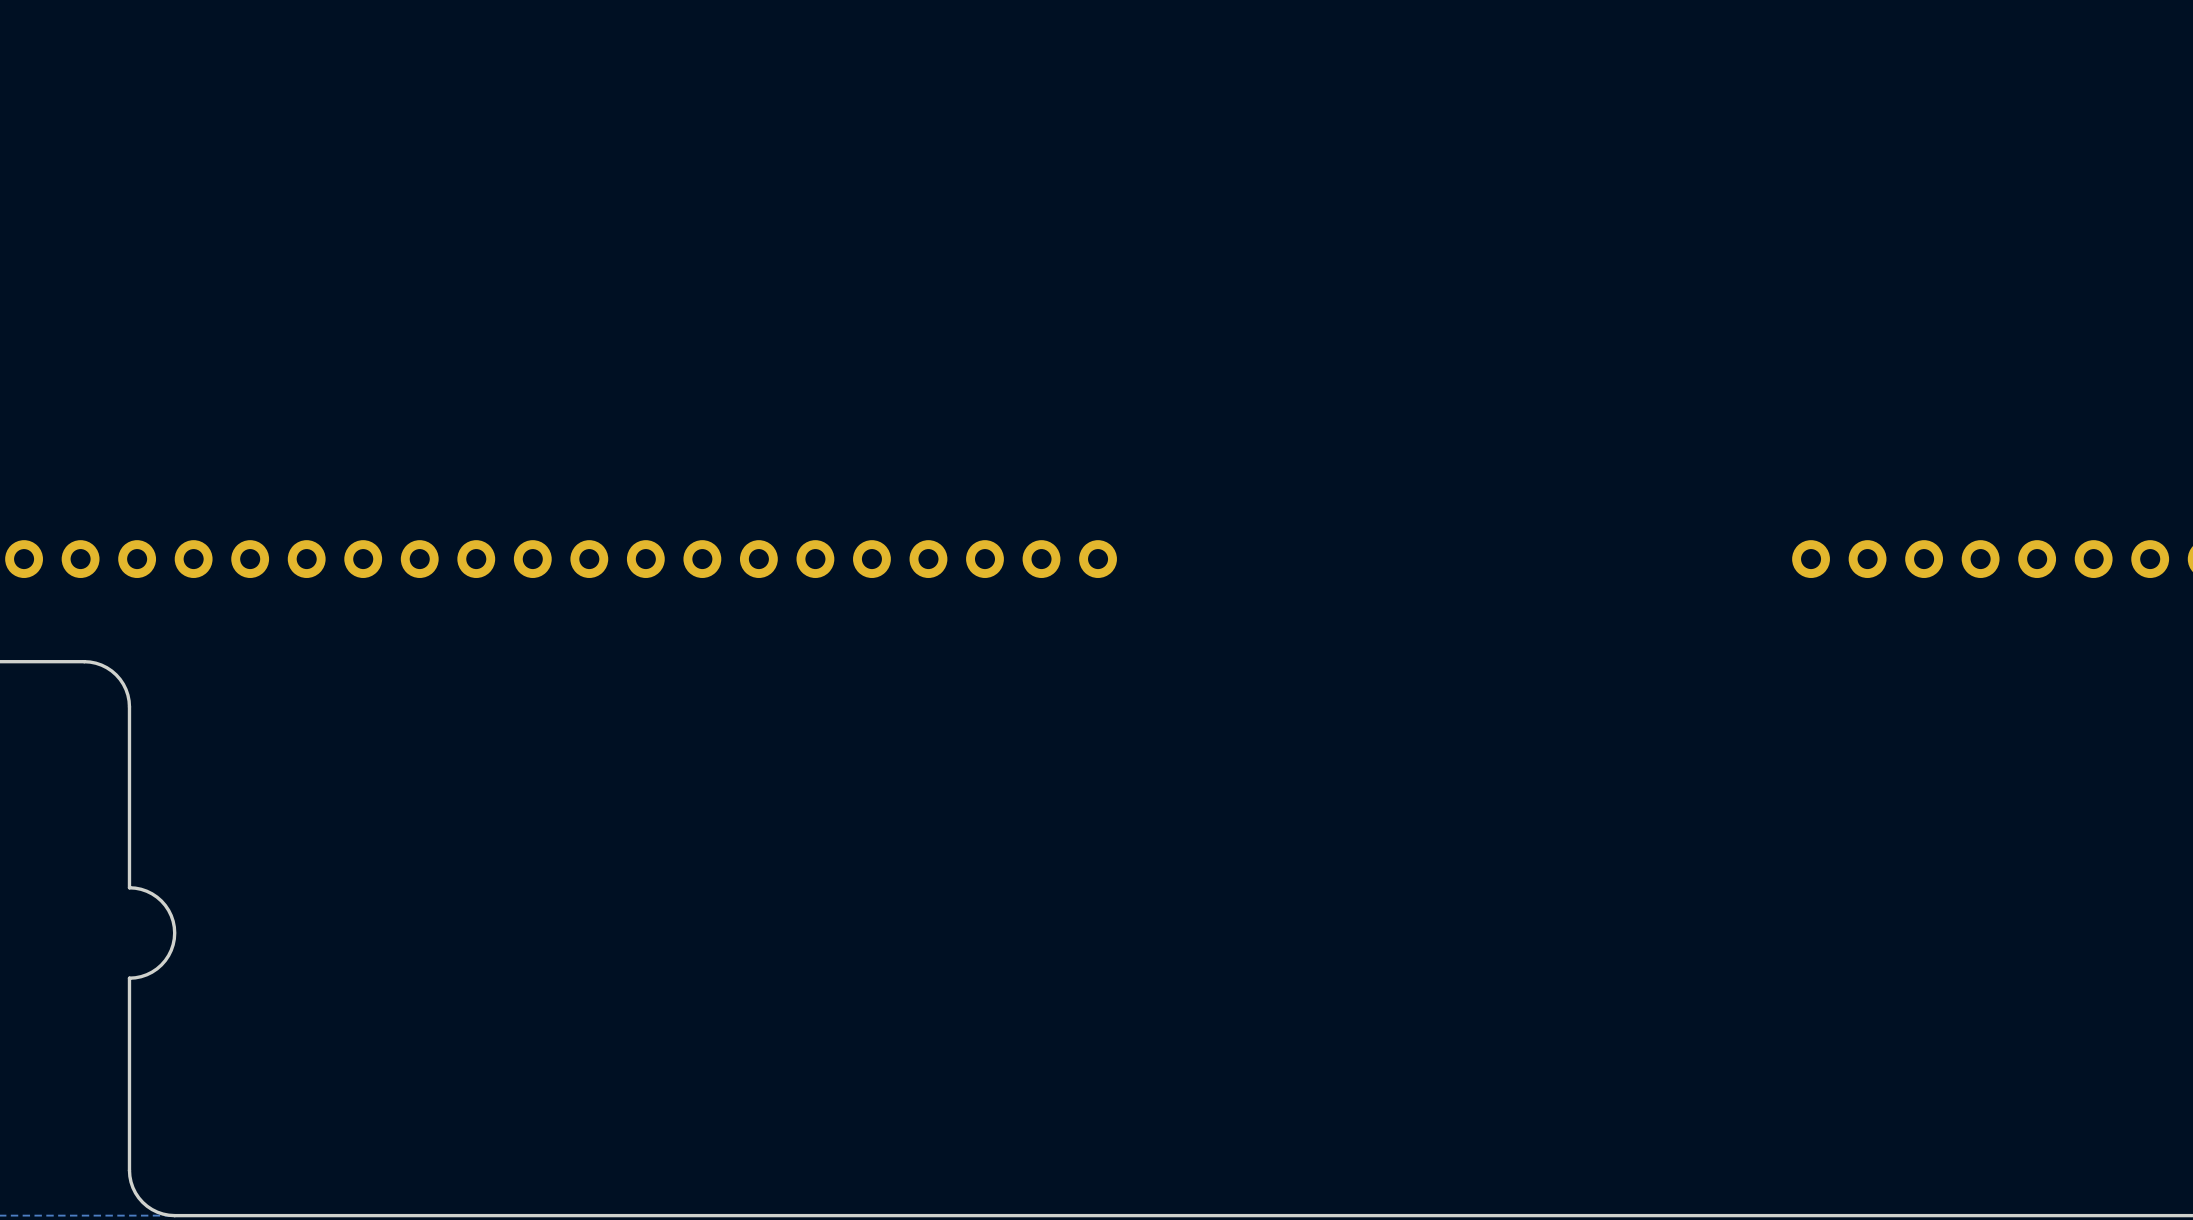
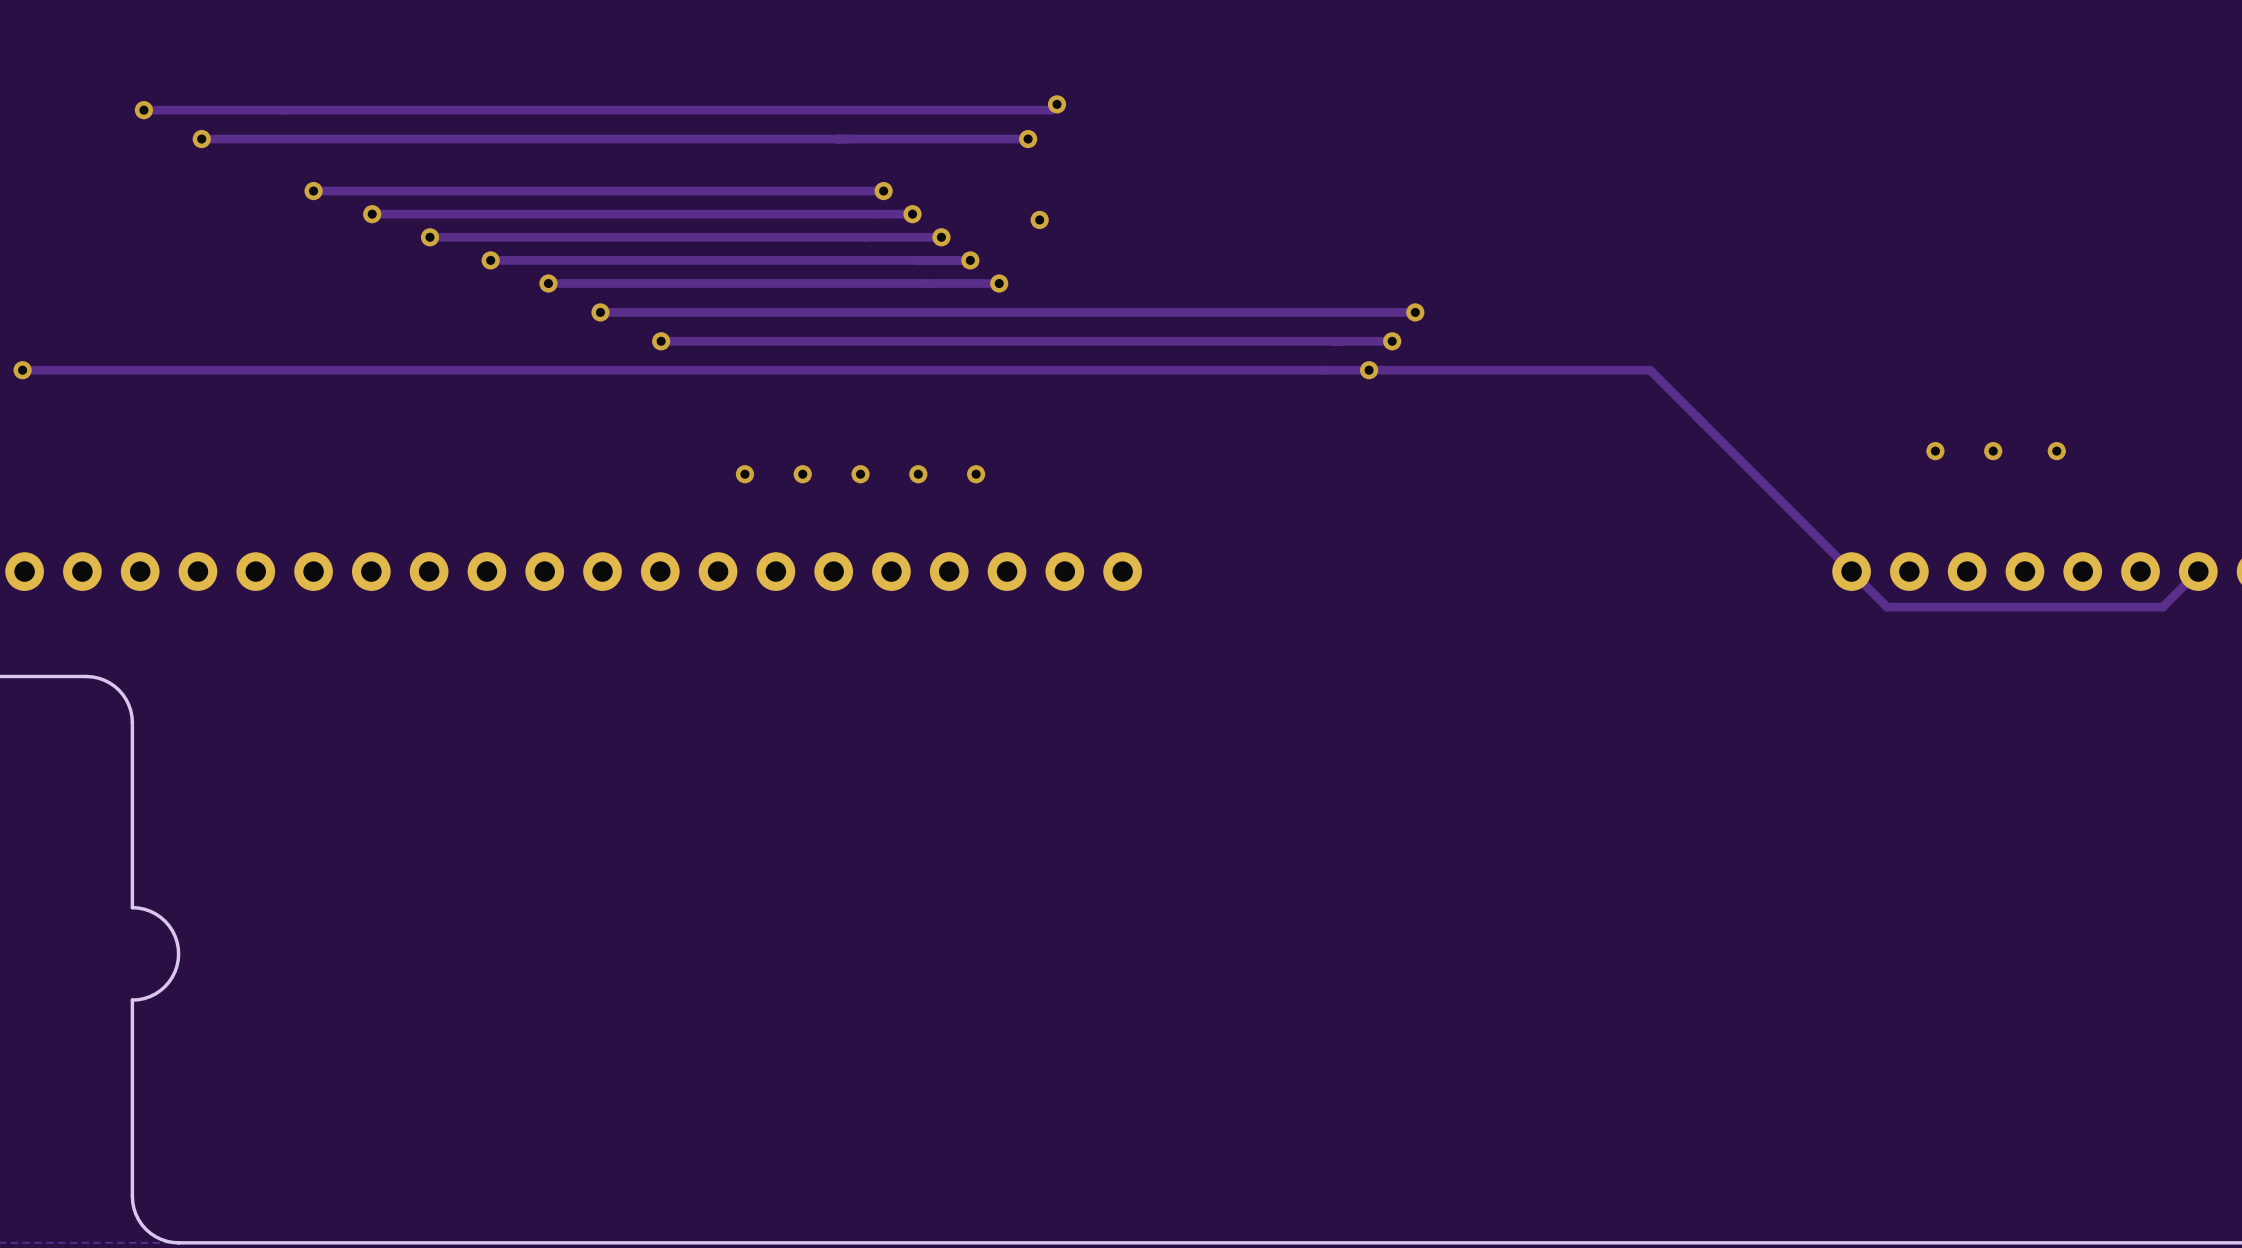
track: none -> (1057, 104) (1051, 110) (143, 110)
via: none -> (1057, 104)
via: none -> (143, 110)
via: none -> (201, 139)
track: none -> (1028, 139) (201, 139)
via: none -> (1028, 139)
via: none -> (313, 191)
track: none -> (882, 191) (313, 191)
via: none -> (883, 191)
via: none -> (372, 214)
track: none -> (912, 214) (372, 214)
via: none -> (912, 214)
via: none -> (1039, 219)
via: none -> (429, 237)
track: none -> (941, 237) (429, 237)
via: none -> (941, 237)
via: none -> (490, 260)
track: none -> (970, 260) (490, 260)
via: none -> (970, 260)
via: none -> (548, 283)
track: none -> (999, 283) (548, 283)
via: none -> (999, 283)
via: none -> (600, 312)
track: none -> (1415, 312) (600, 312)
via: none -> (1415, 312)
via: none -> (661, 341)
track: none -> (1392, 341) (661, 341)
via: none -> (1392, 341)
track: none -> (22, 370) (1650, 370) (1887, 607) (2162, 607) (2198, 571)
via: none -> (22, 370)
via: none -> (1369, 370)
via: none -> (1935, 451)
via: none -> (1993, 451)
via: none -> (2056, 451)
via: none -> (744, 474)
via: none -> (802, 474)
via: none -> (860, 474)
via: none -> (918, 474)
via: none -> (976, 474)

